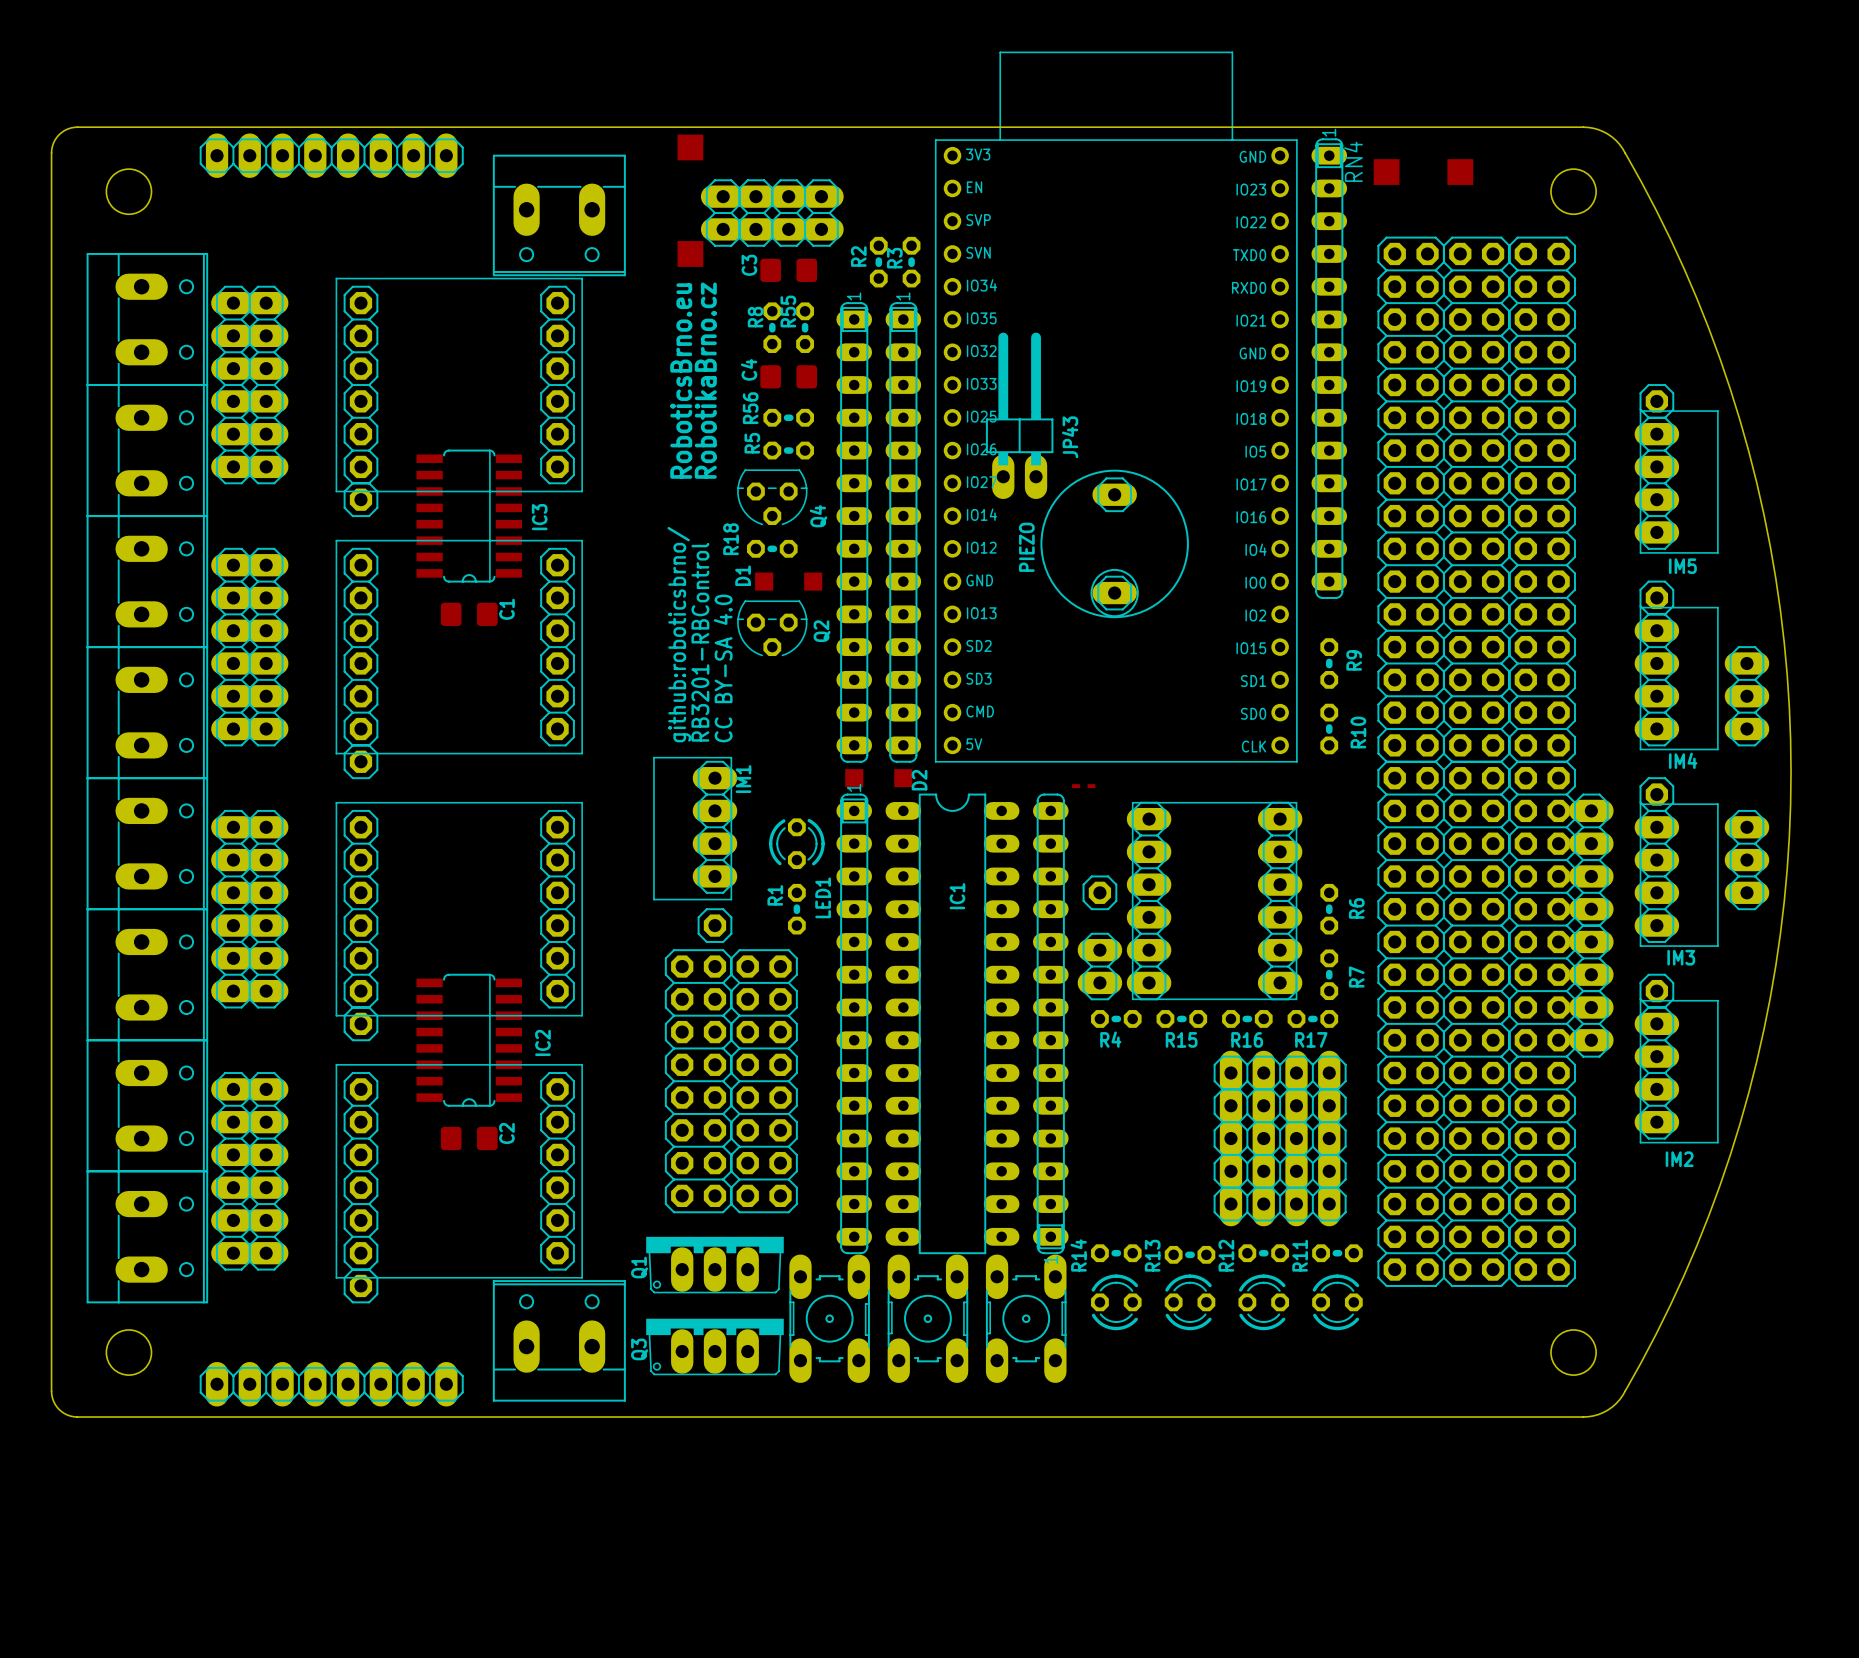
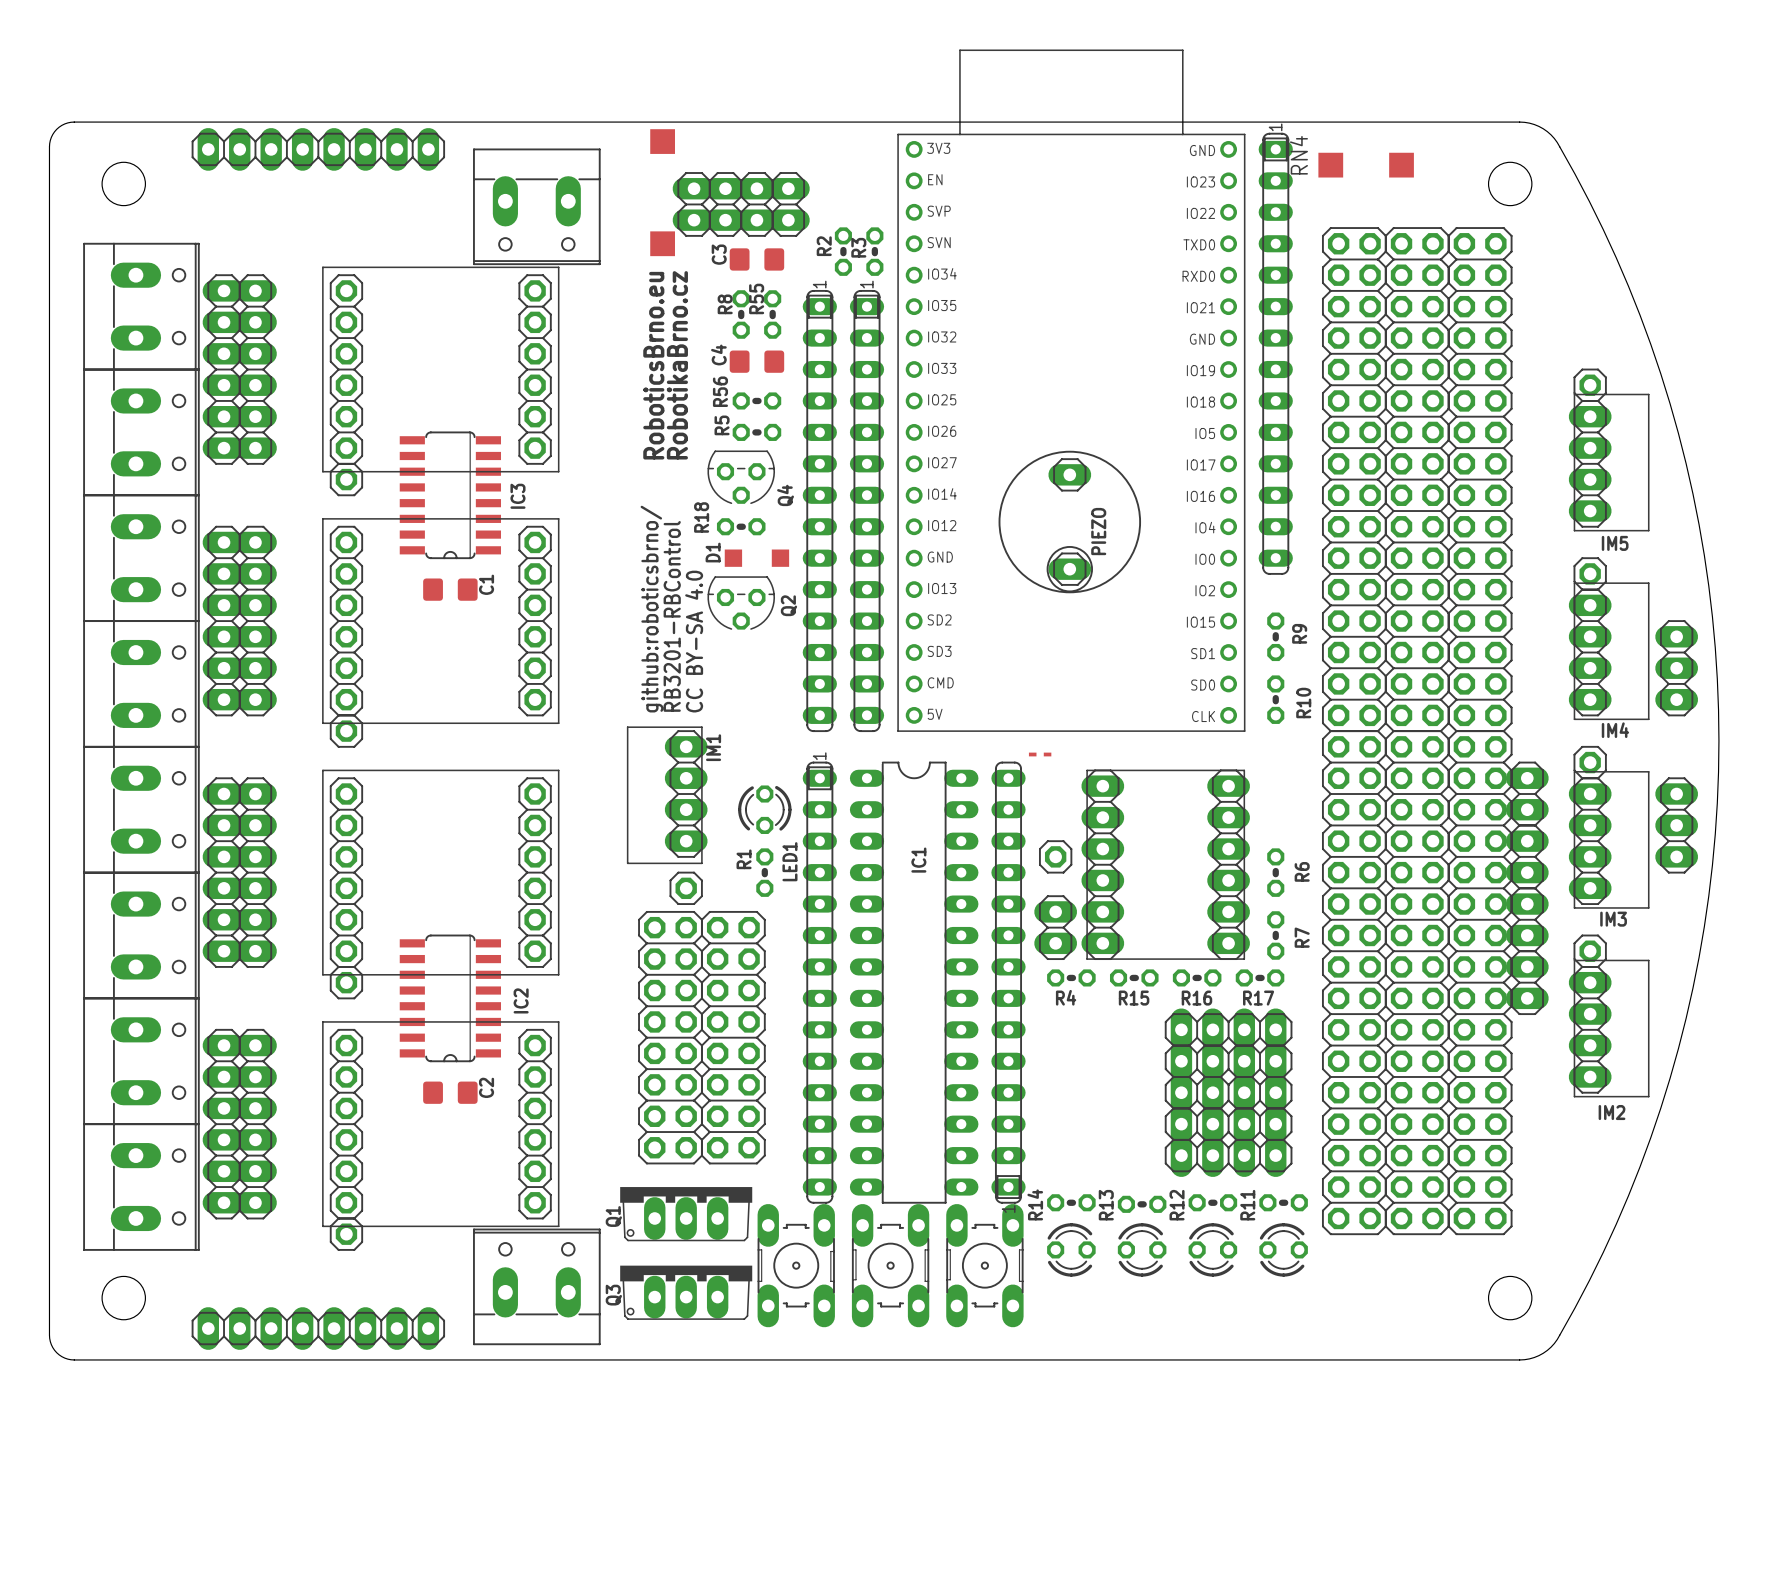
JP43: (1019, 415) -> none
PIEZO name position: PIEZO (1026, 547) -> PIEZO (1098, 531)
D2: (878, 778) -> none

